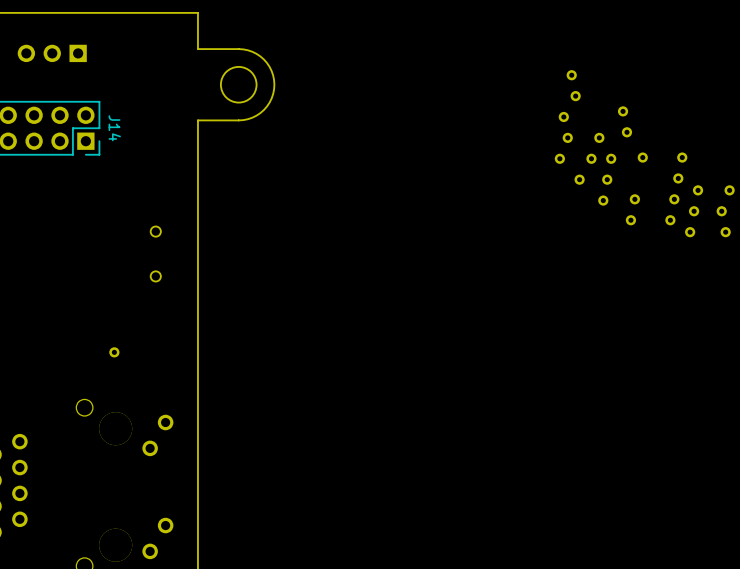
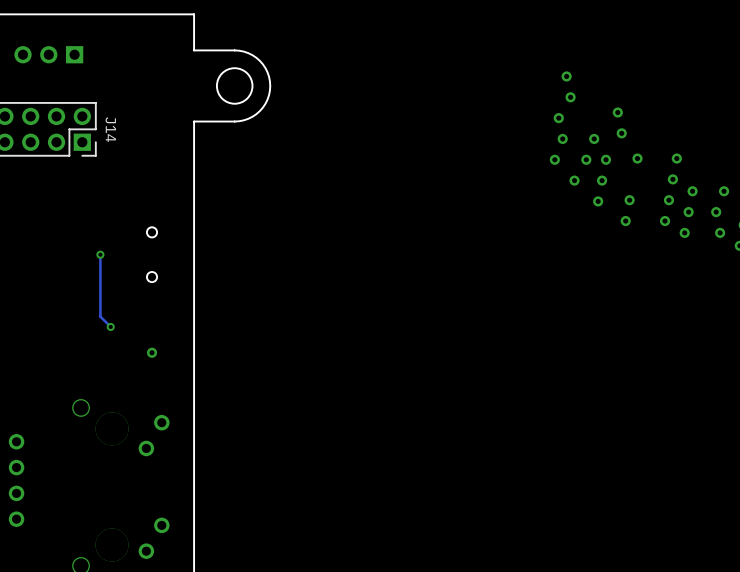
track: none -> (100, 254) (100, 316) (110, 326)
via: none -> (100, 254)
via: none -> (110, 326)
part position: (114, 352) -> (152, 352)

